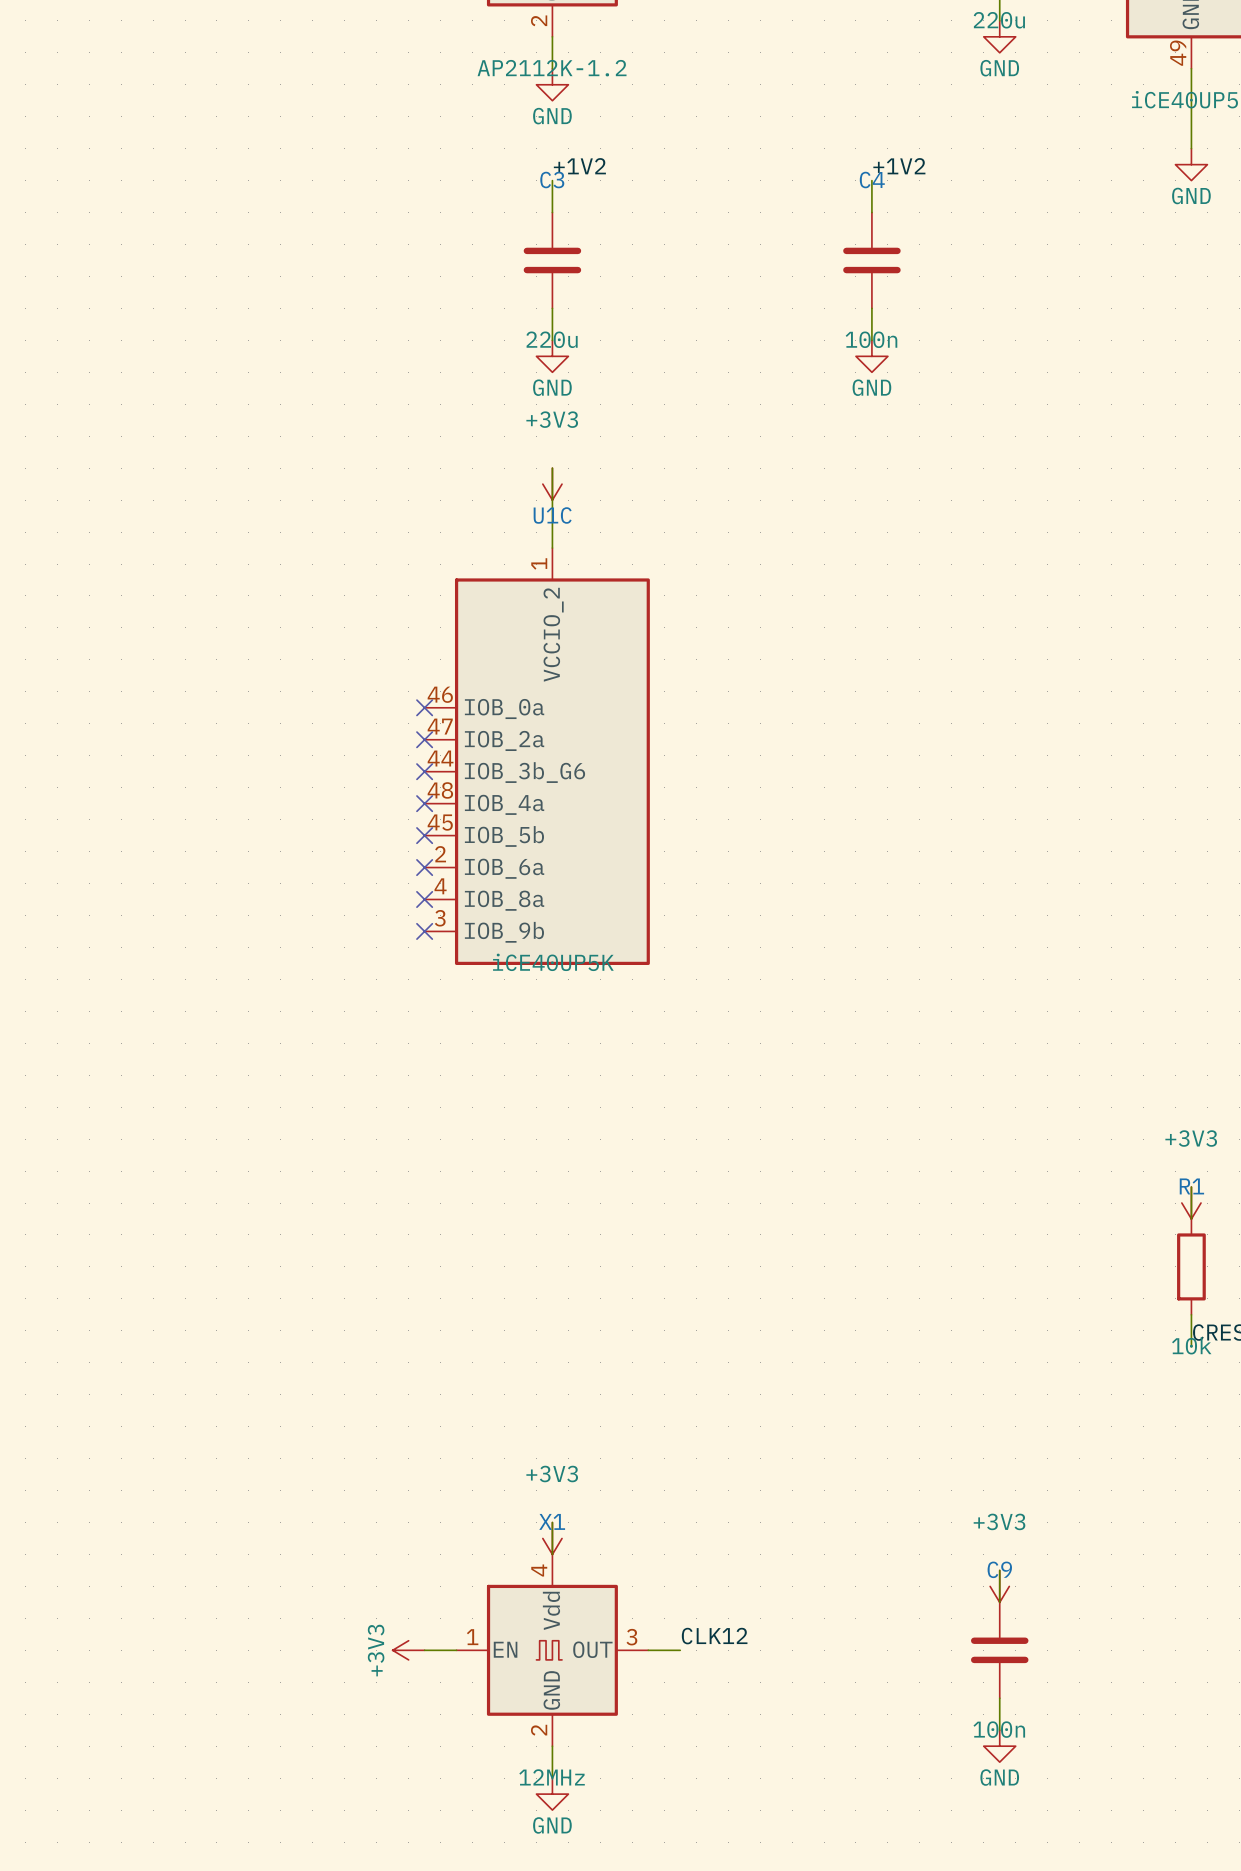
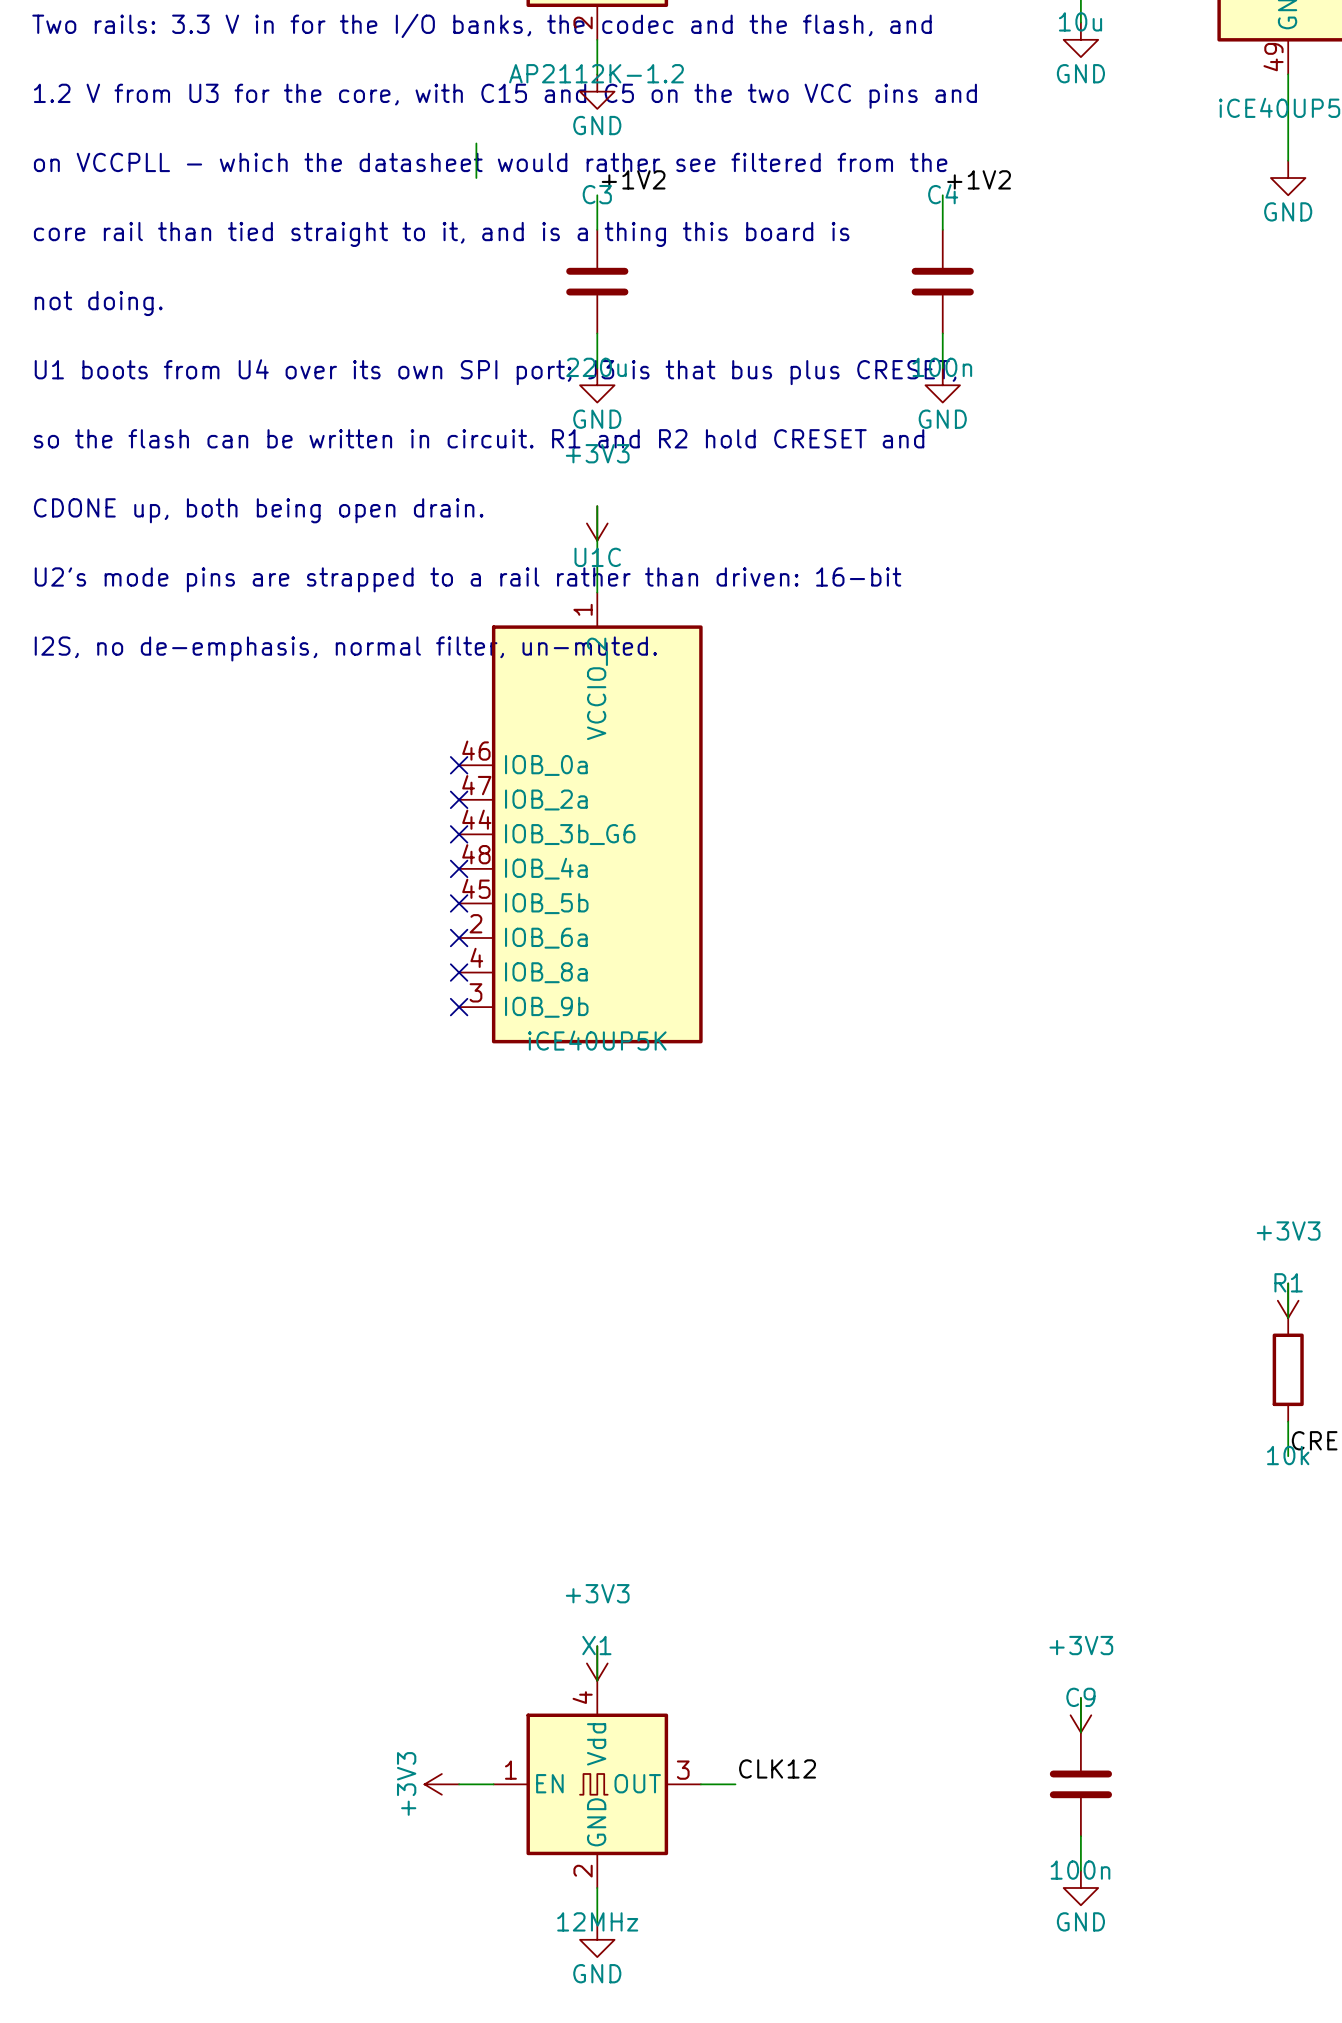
part value: 220u (999, 20) -> 10u (1080, 21)
text: none -> Two rails: 3.3 V in for the I/O banks, the codec and the flash, and (481, 25)
text: none -> 1.2 V from U3 for the core, with C15 and C5 on the two VCC pins and (505, 96)
wire: none -> (476, 143) (476, 178)
text: none -> on VCCPLL - which the datasheet would rather see filtered from the (490, 162)
text: none -> core rail than tied straight to it, and is a thing this board is (441, 234)
text: none -> not doing. (98, 303)
text: none -> U1 boots from U4 over its own SPI port; J3 is that bus plus CRESET, (495, 372)
text: none -> so the flash can be written in circuit. R1 and R2 hold CRESET and (479, 438)
text: none -> CDONE up, both being open drain. (258, 510)
text: none -> U2's mode pins are strapped to a rail rather than driven: 16-bit (467, 579)
text: none -> I2S, no de-emphasis, normal filter, un-muted. (345, 648)

